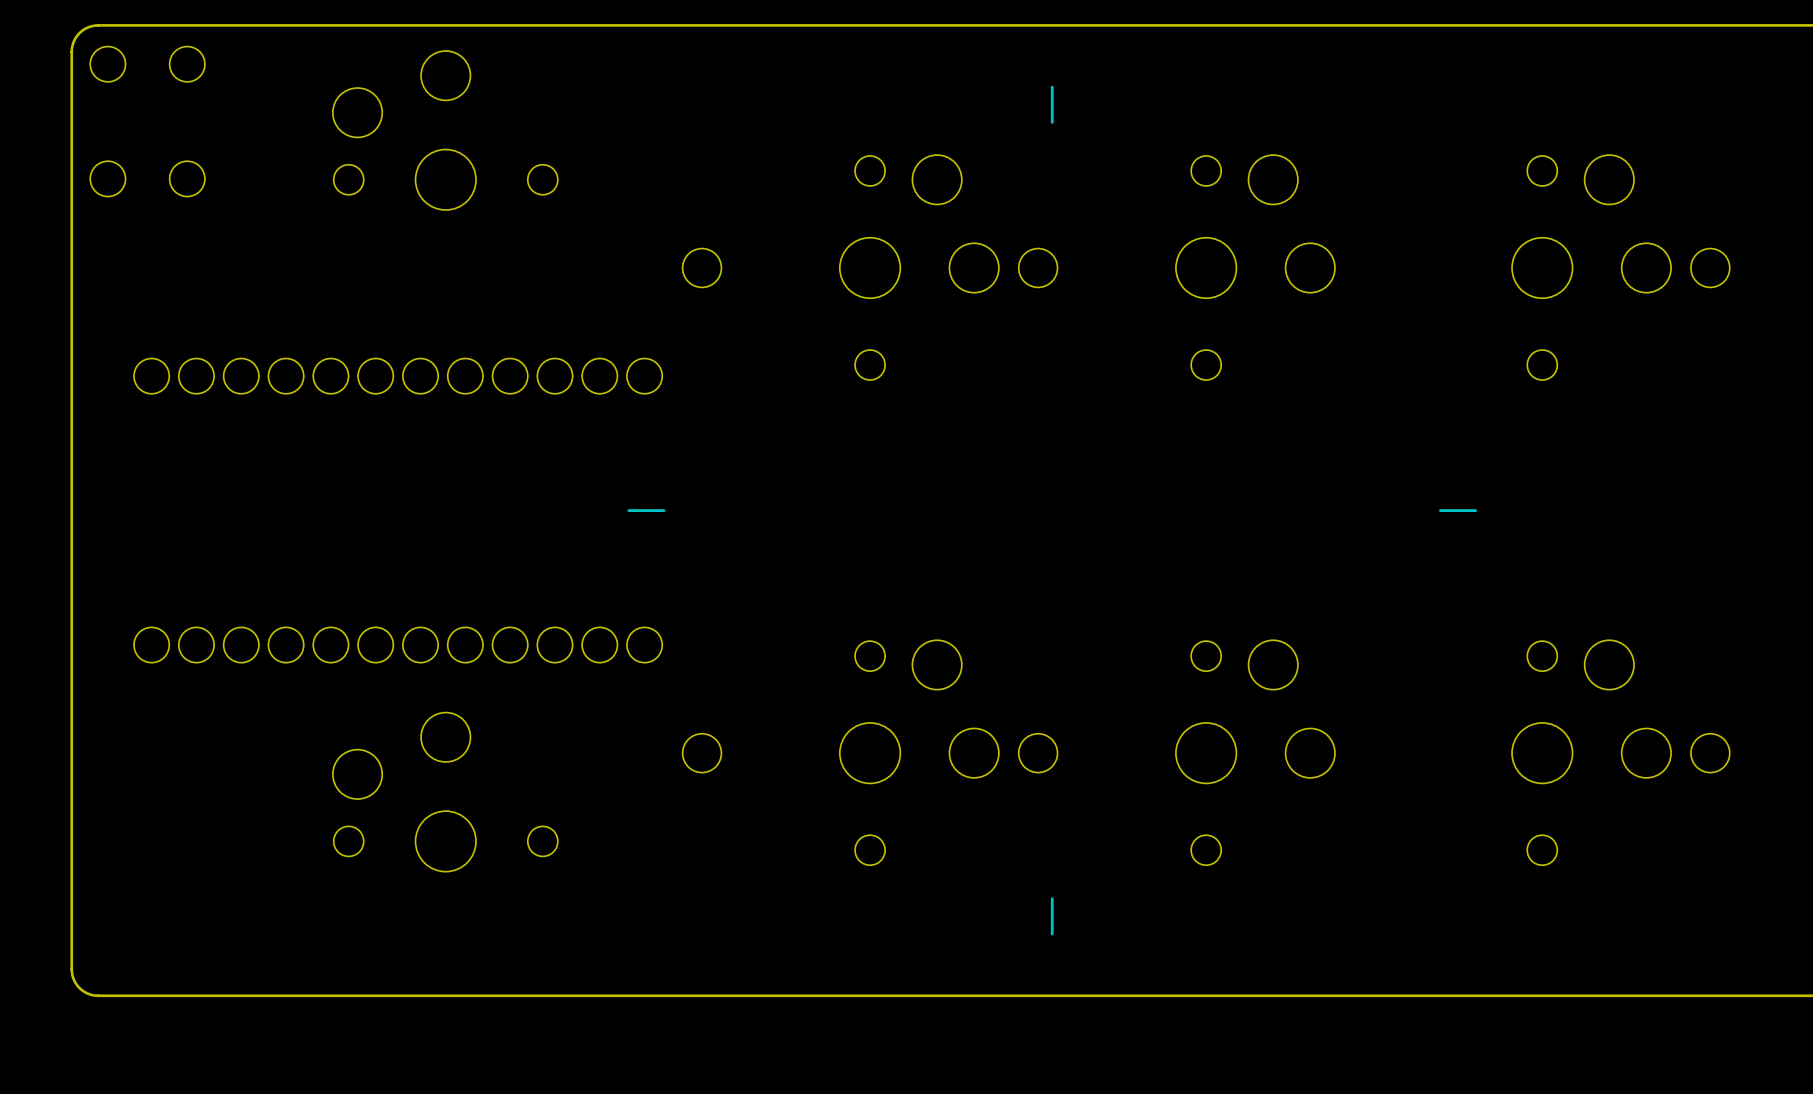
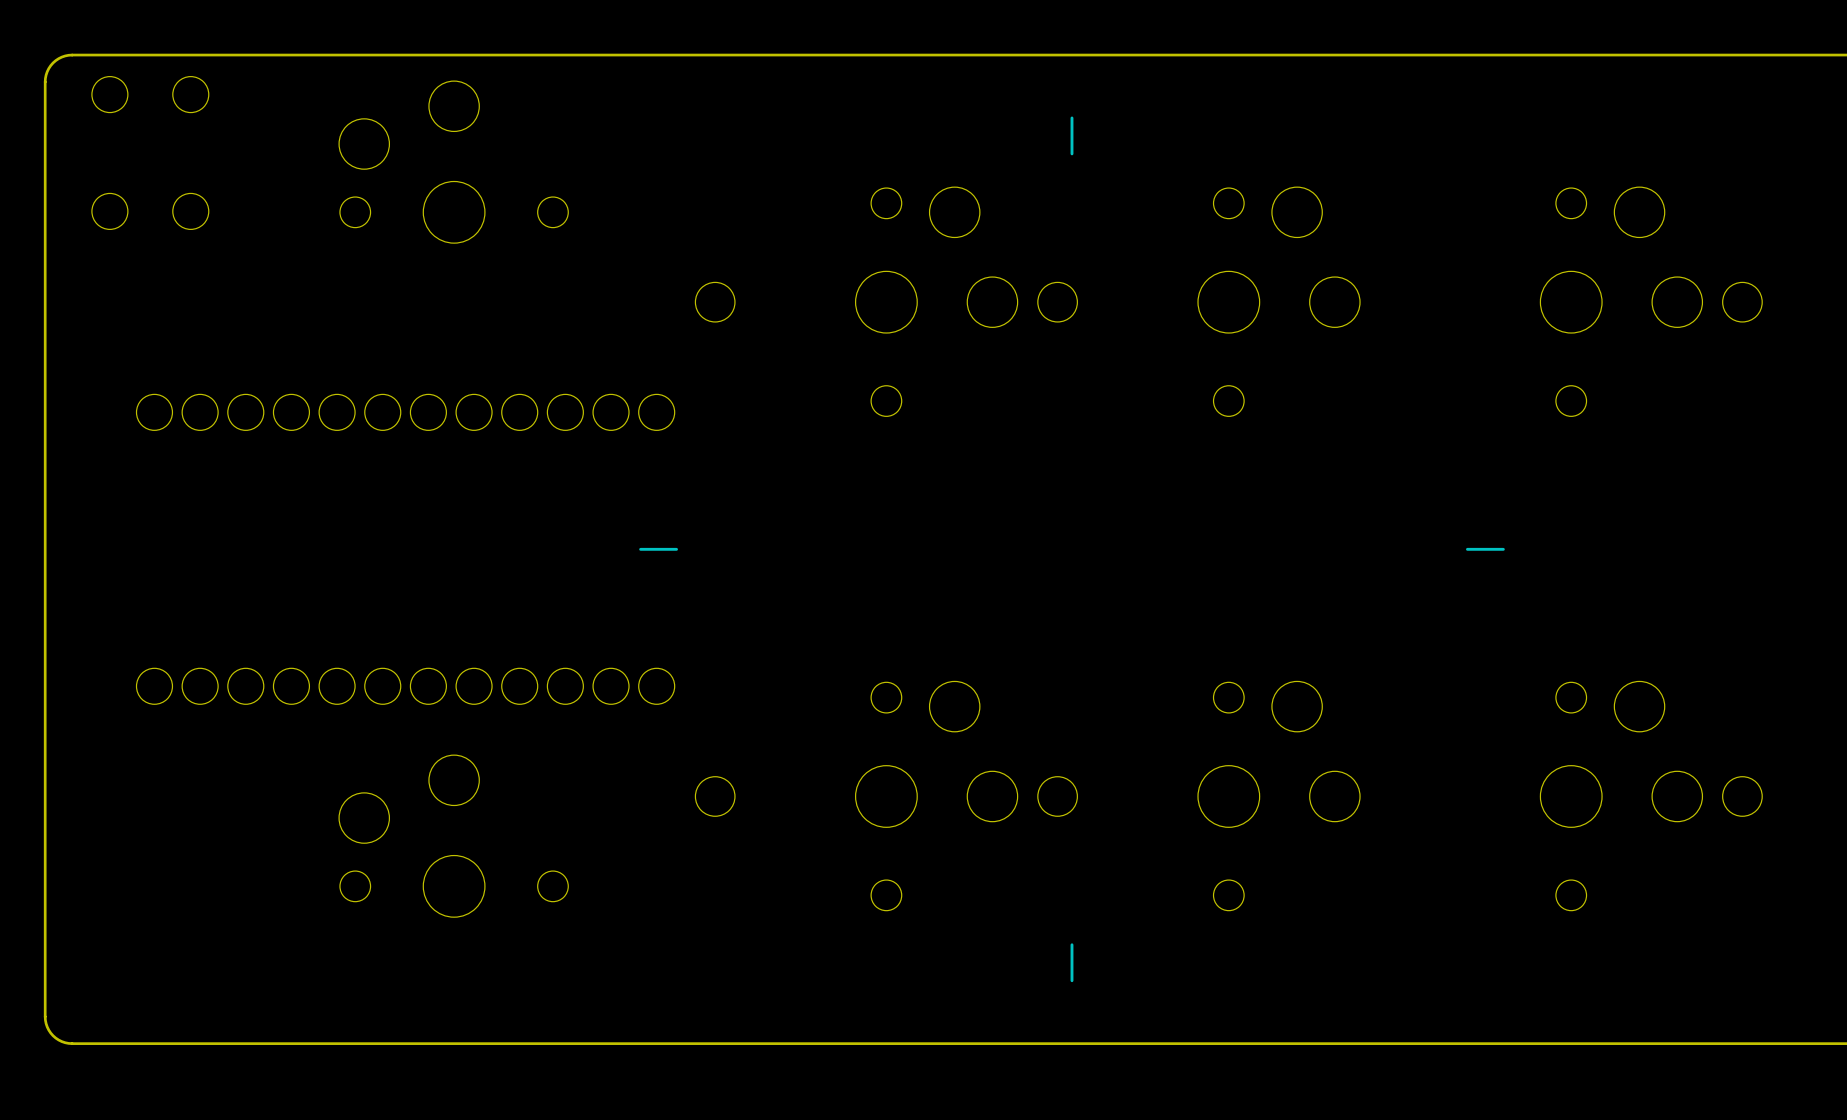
board edge: (98, 25) (88, 27) (79, 33) (73, 41) (71, 51) (71, 969) (73, 979) (79, 988) (88, 993) (98, 995) -> (100, 55) (61, 57) (50, 65) (45, 82) (45, 1016) (50, 1033) (61, 1041) (100, 1043)

